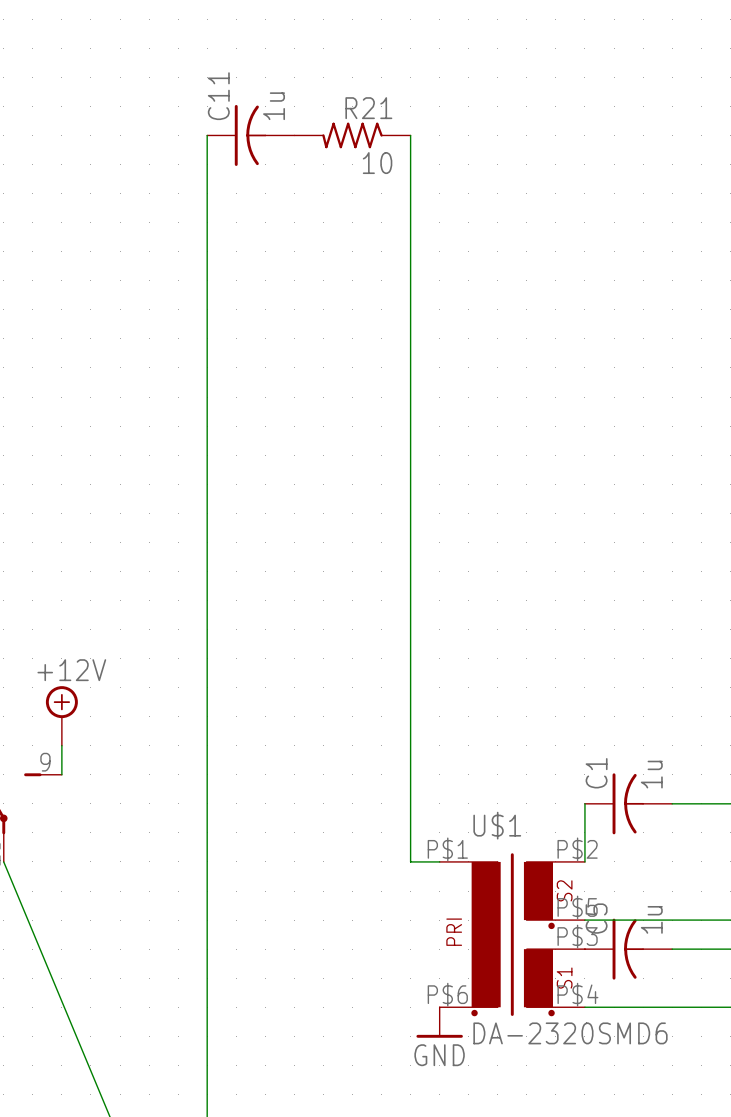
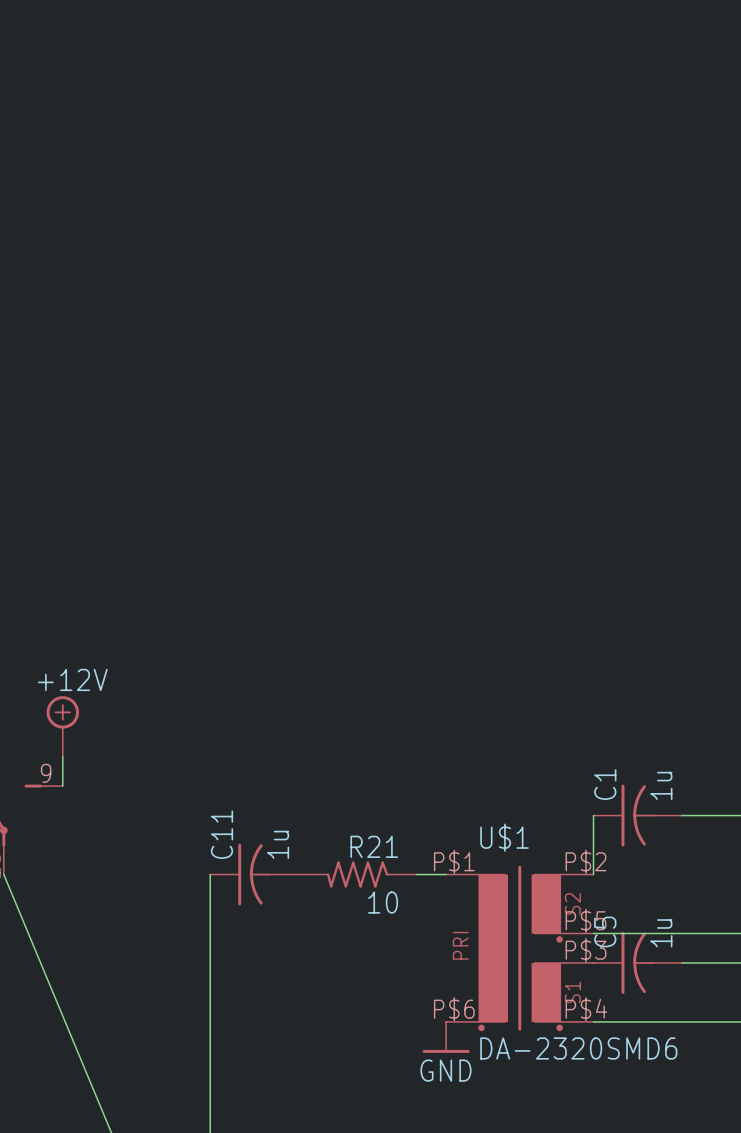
wire: (207, 135) (207, 861) -> none
C11 position: (250, 135) -> (254, 874)
R21 position: (352, 135) -> (357, 874)
wire: (410, 135) (410, 861) -> none

